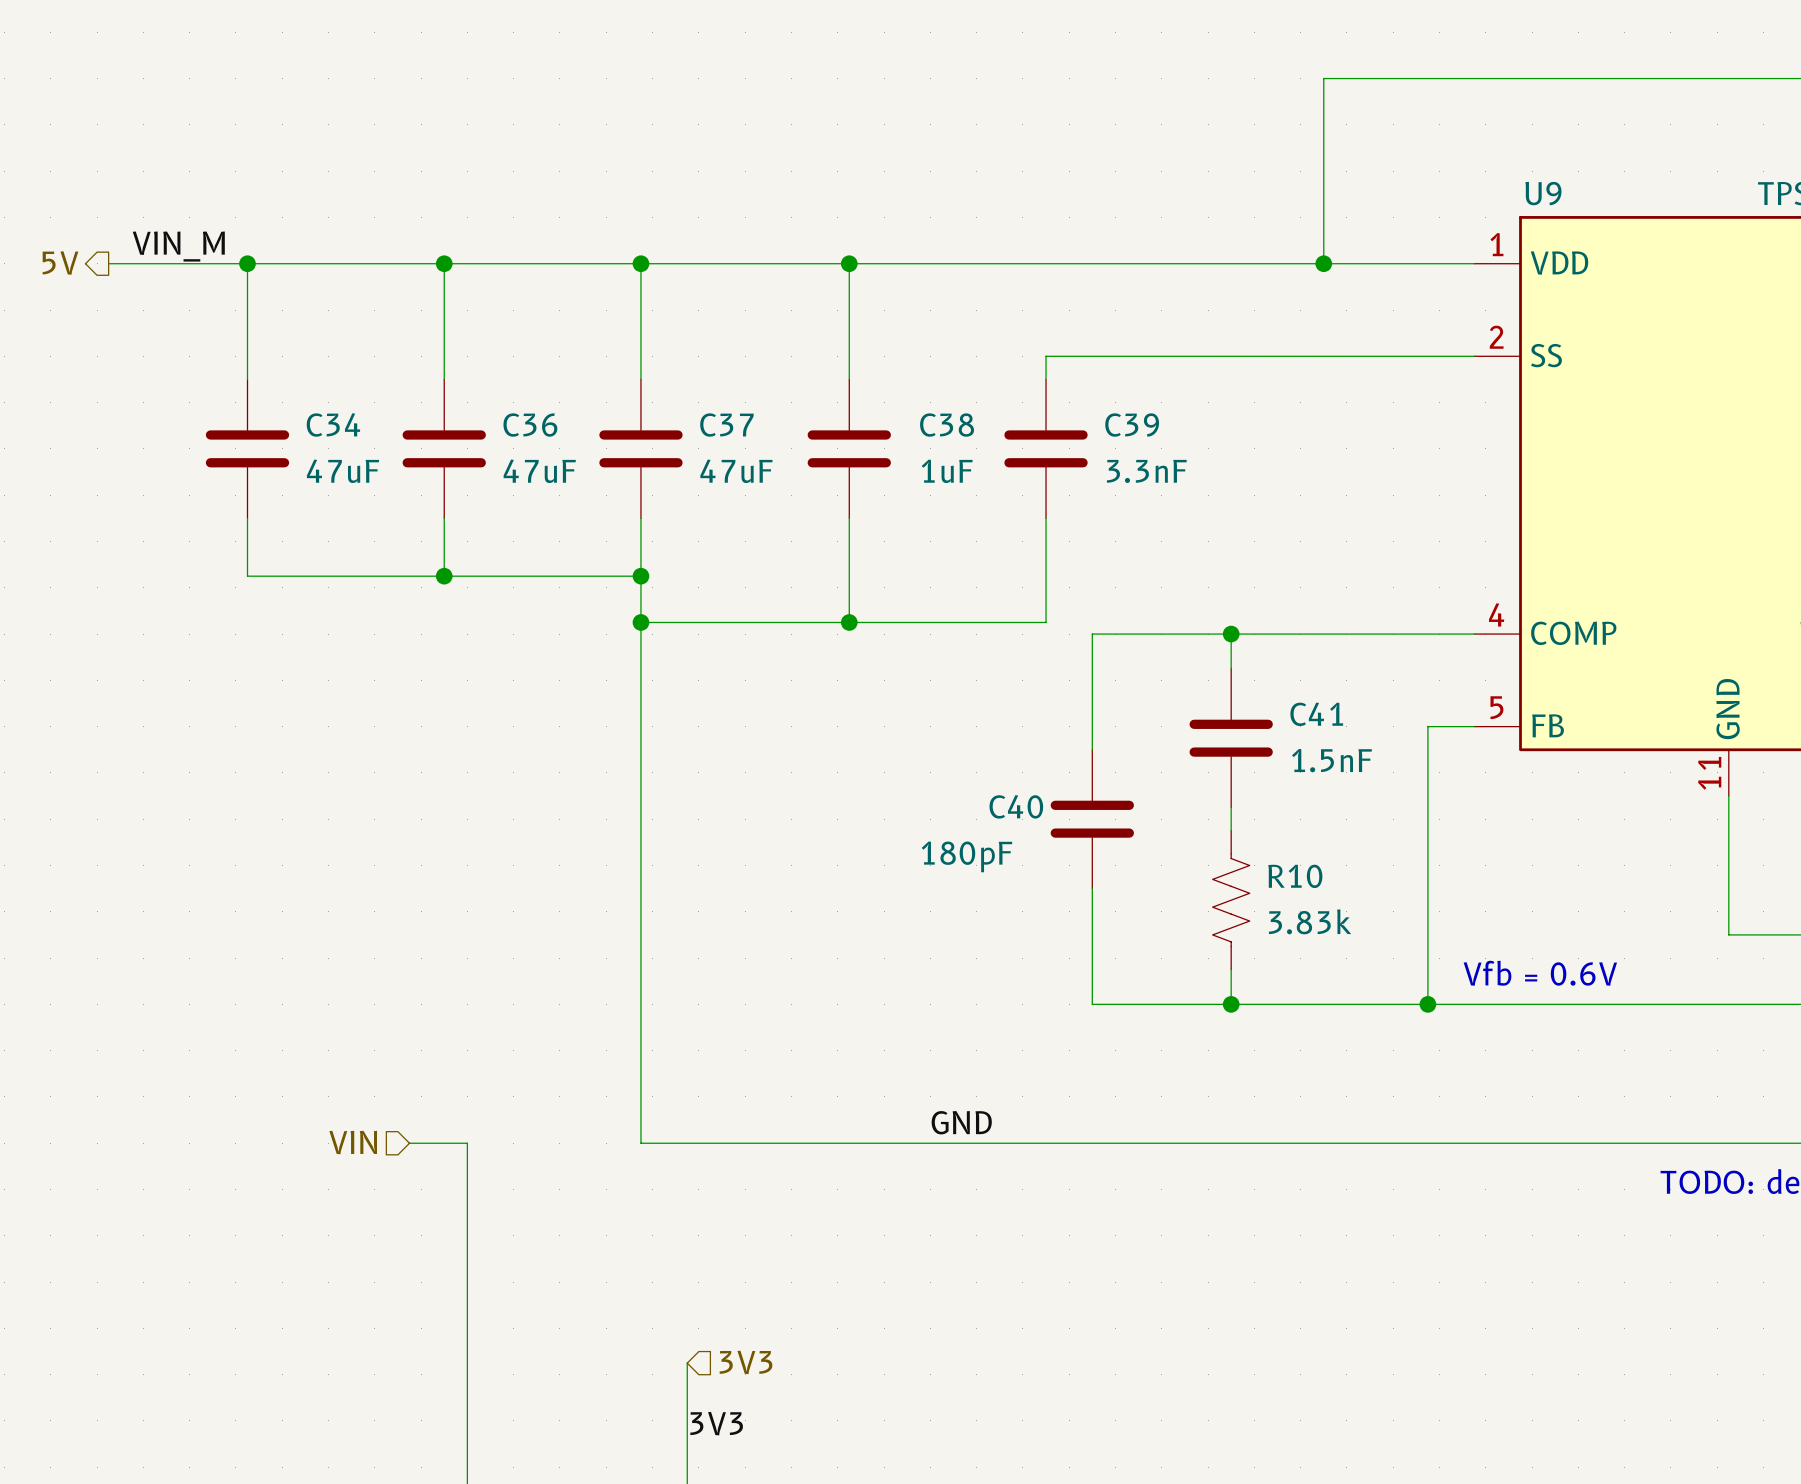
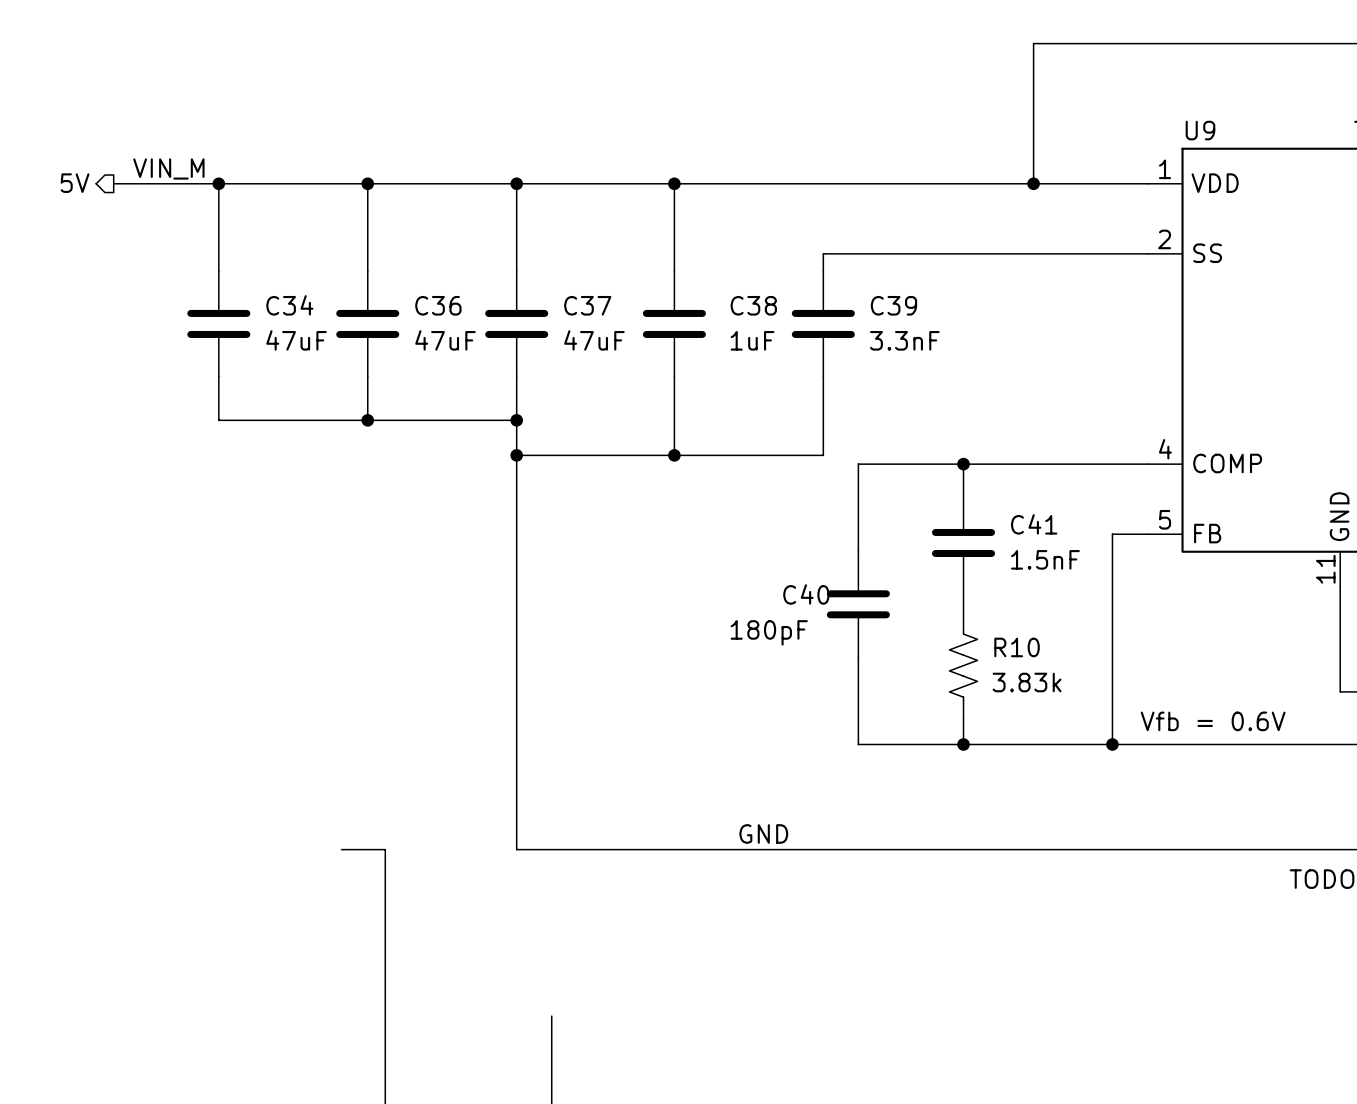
hierarchical label: VIN (353, 1142) -> none
hierarchical label: 3V3 (746, 1362) -> none
label: 3V3 (716, 1423) -> none

